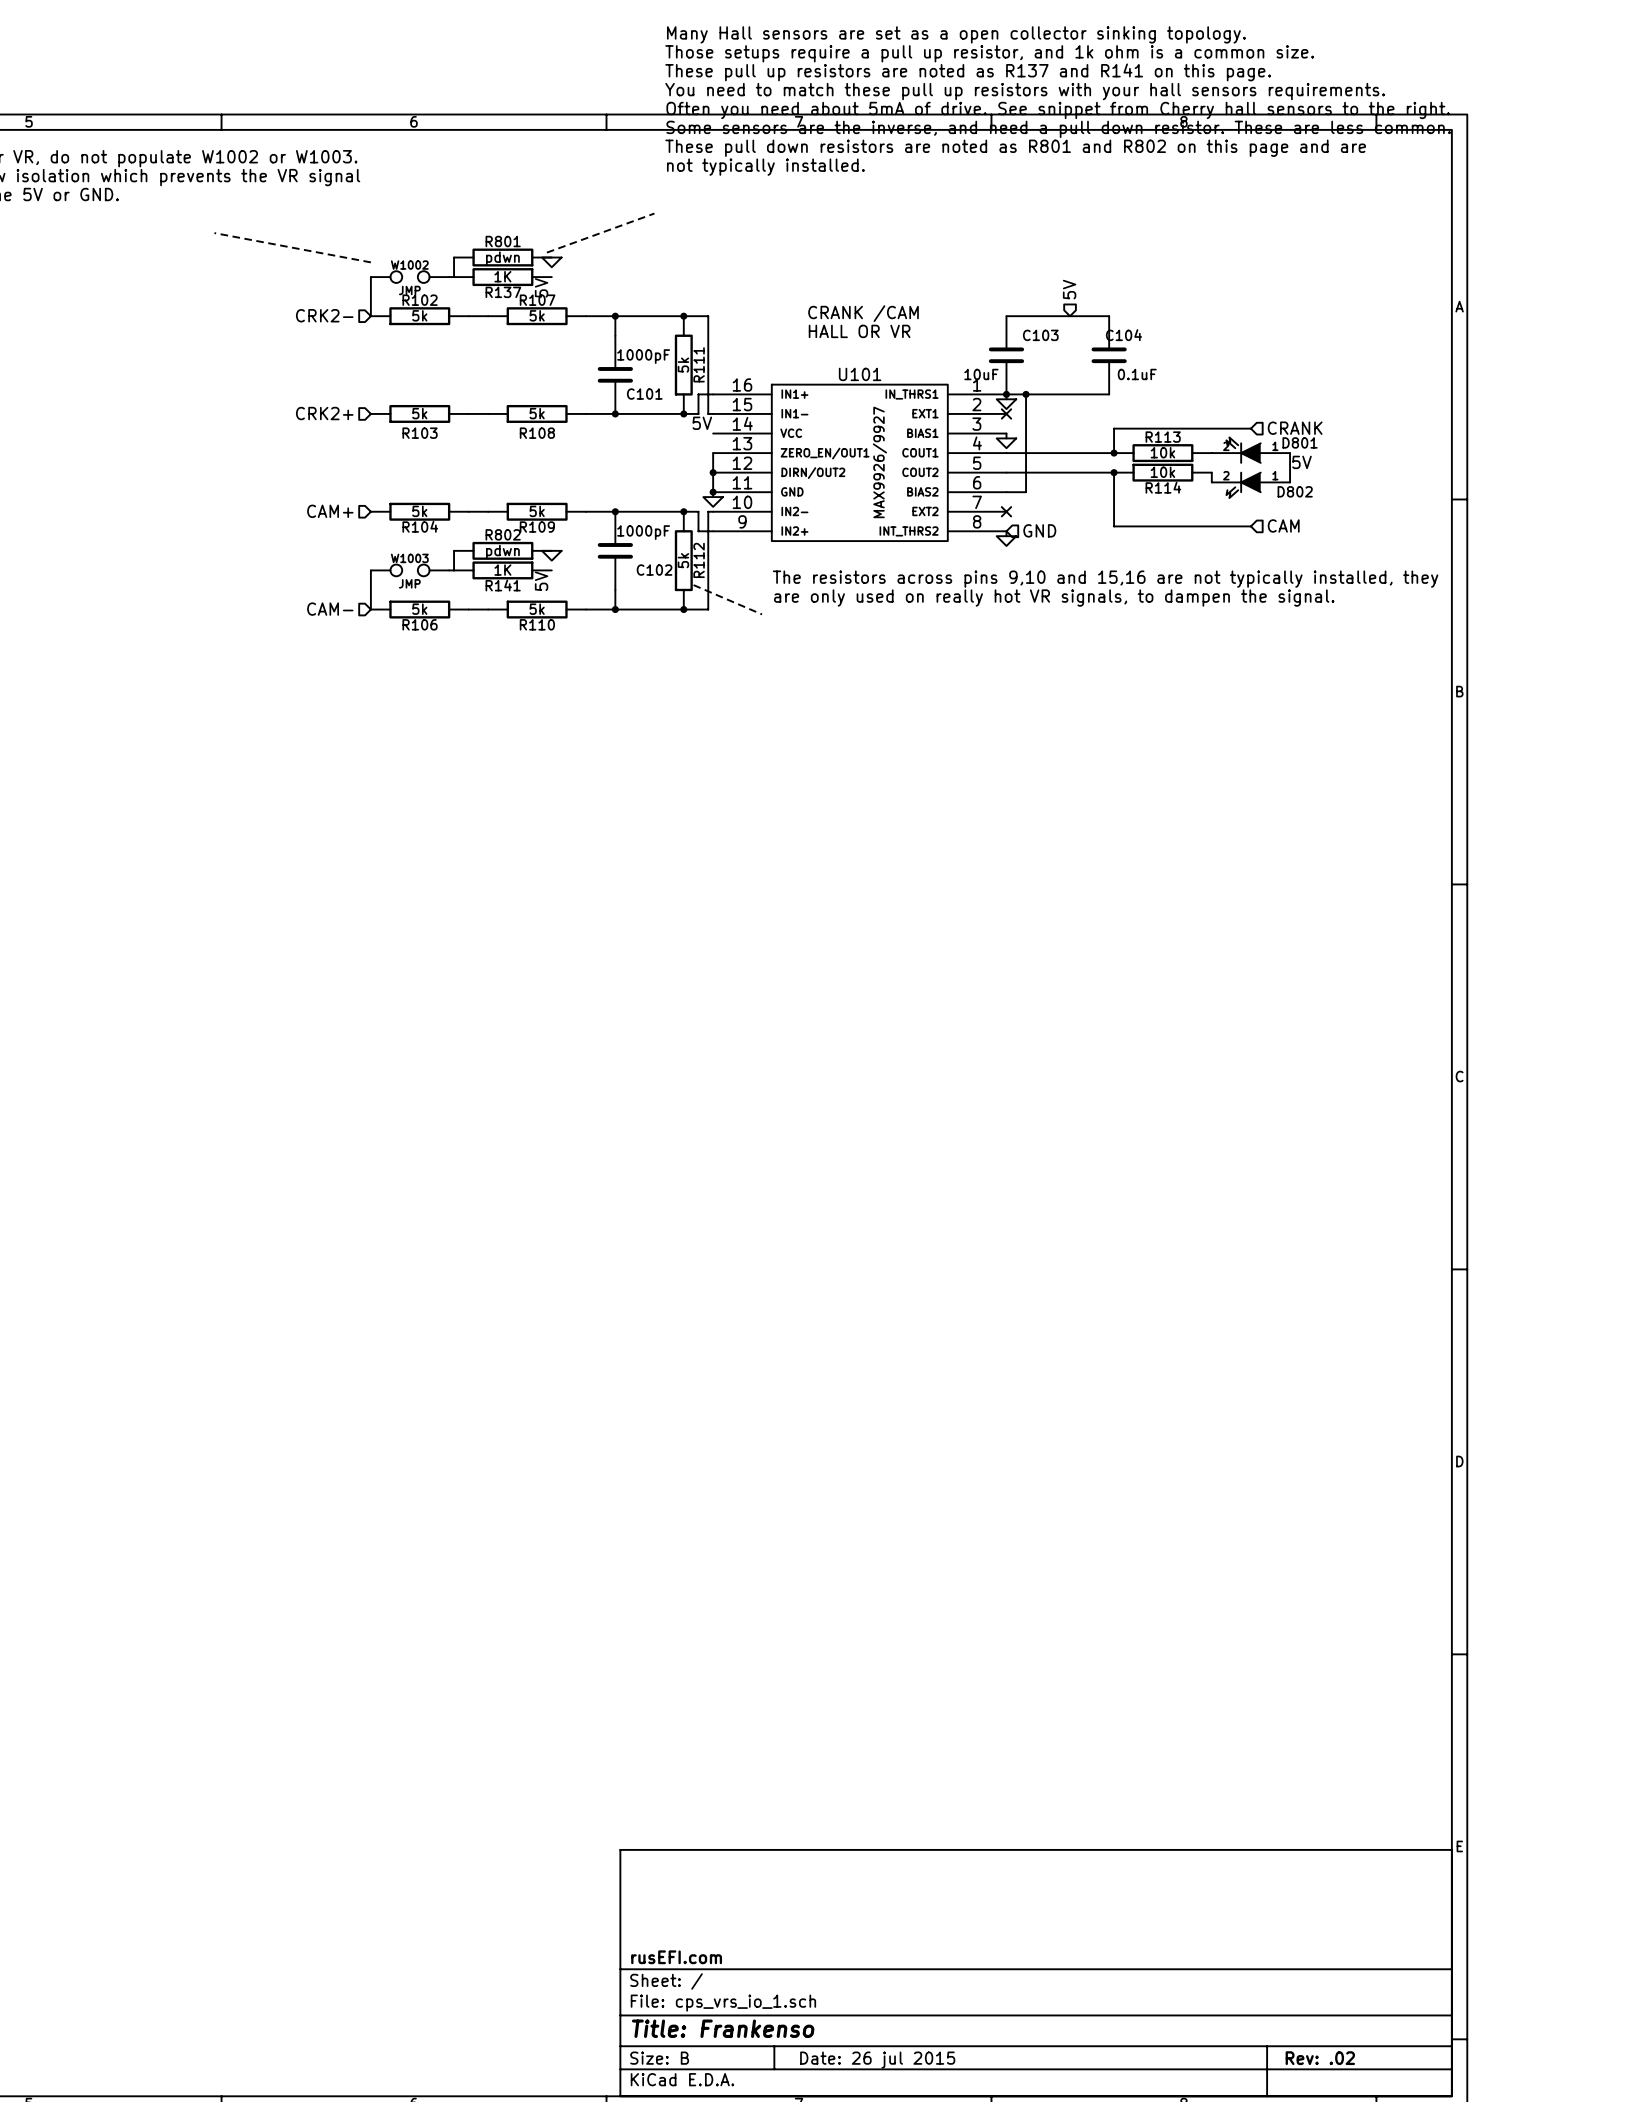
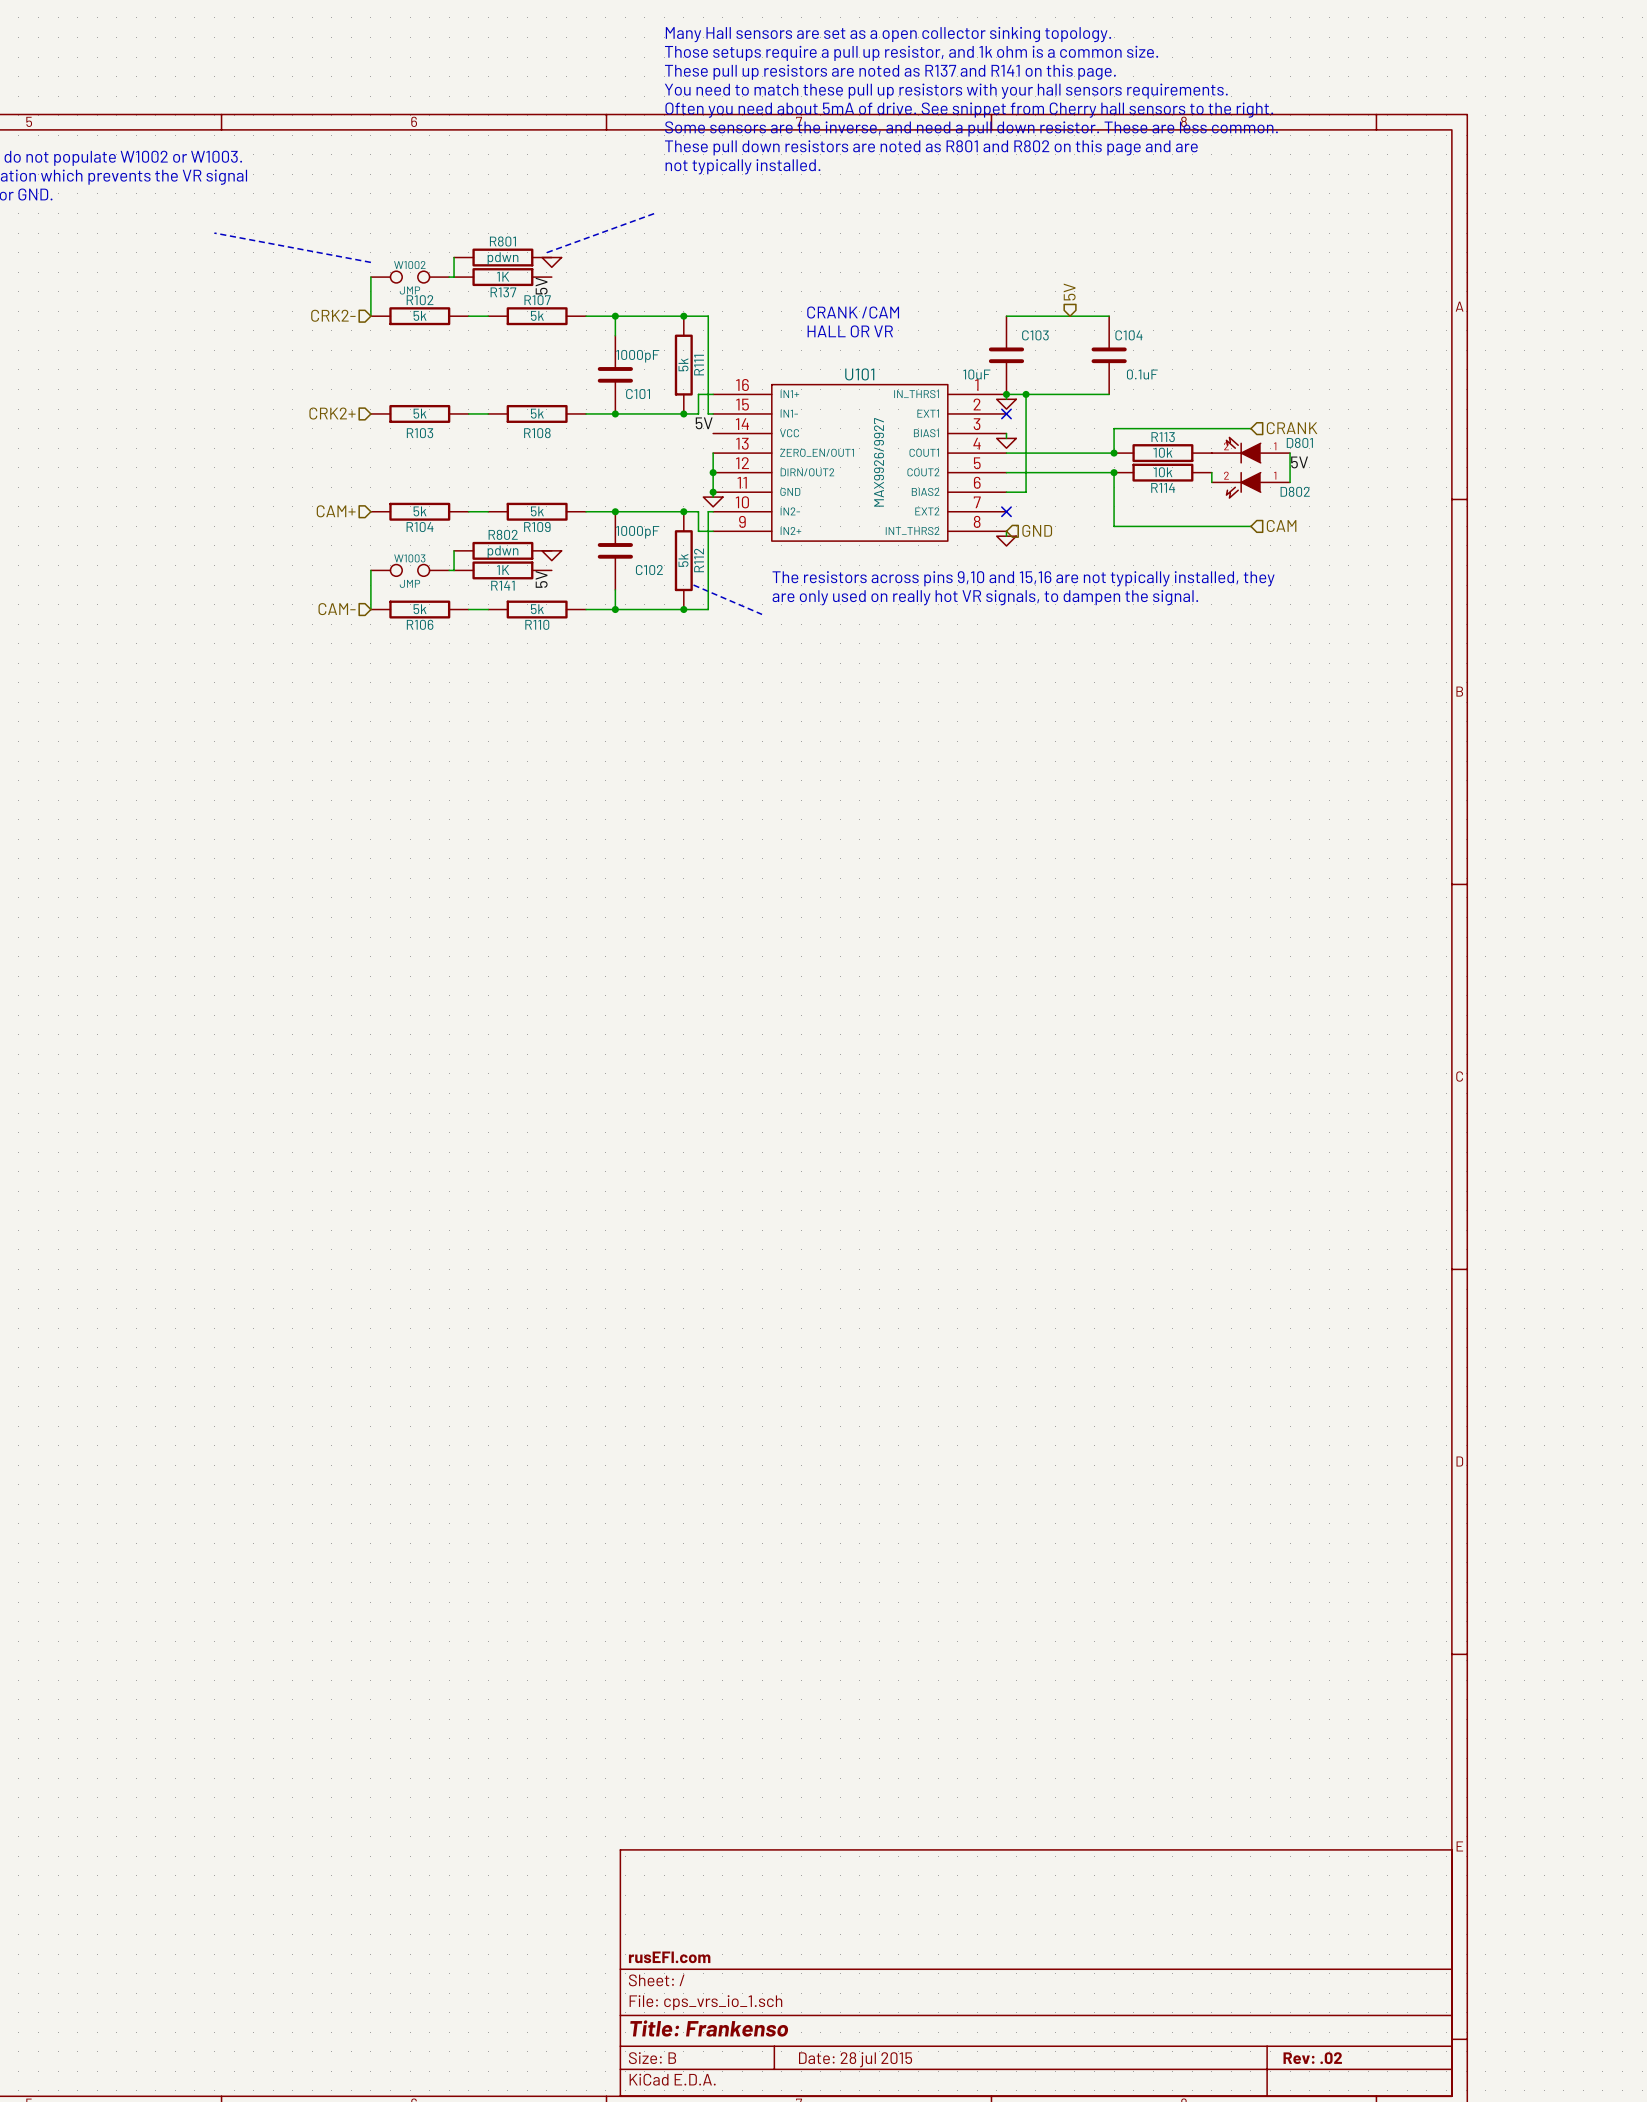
title block: Date: 26 jul 2015 (877, 2060) -> Date: 28 jul 2015 (855, 2059)

